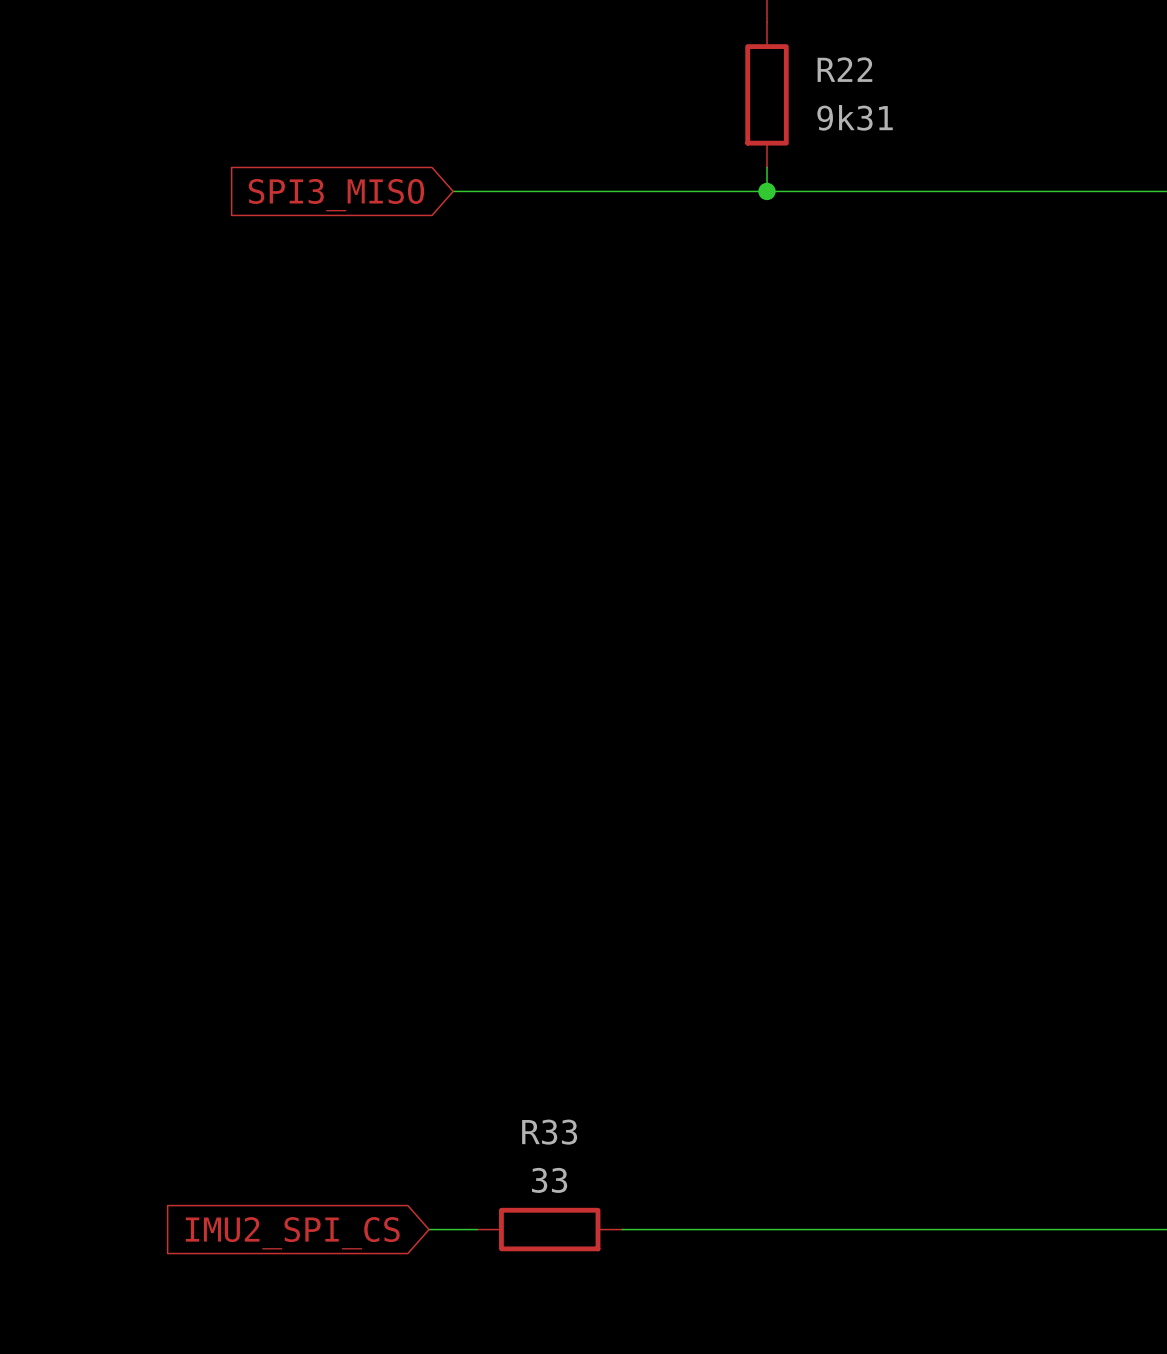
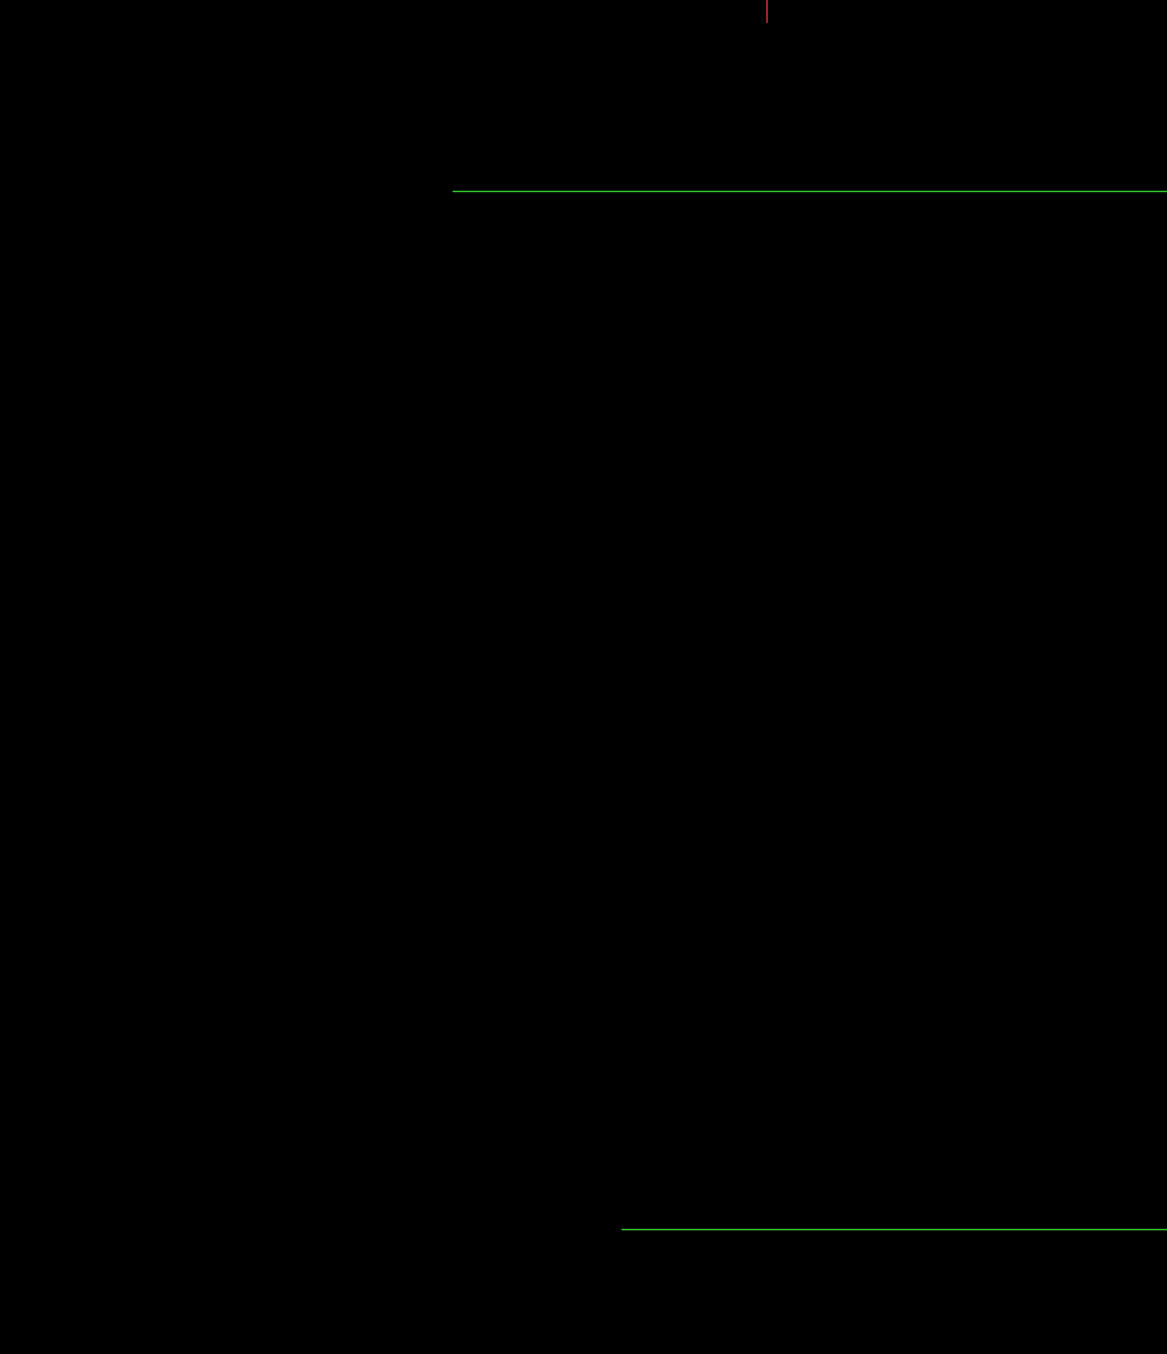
R22: 9k31 (767, 94) -> none
wire: (767, 167) (767, 191) -> none
junction: (767, 191) -> none
global label: SPI3_MISO (336, 195) -> none
wire: (429, 1229) (477, 1229) -> none
R33: 33 (549, 1229) -> none
global label: IMU2_SPI_CS (292, 1233) -> none

